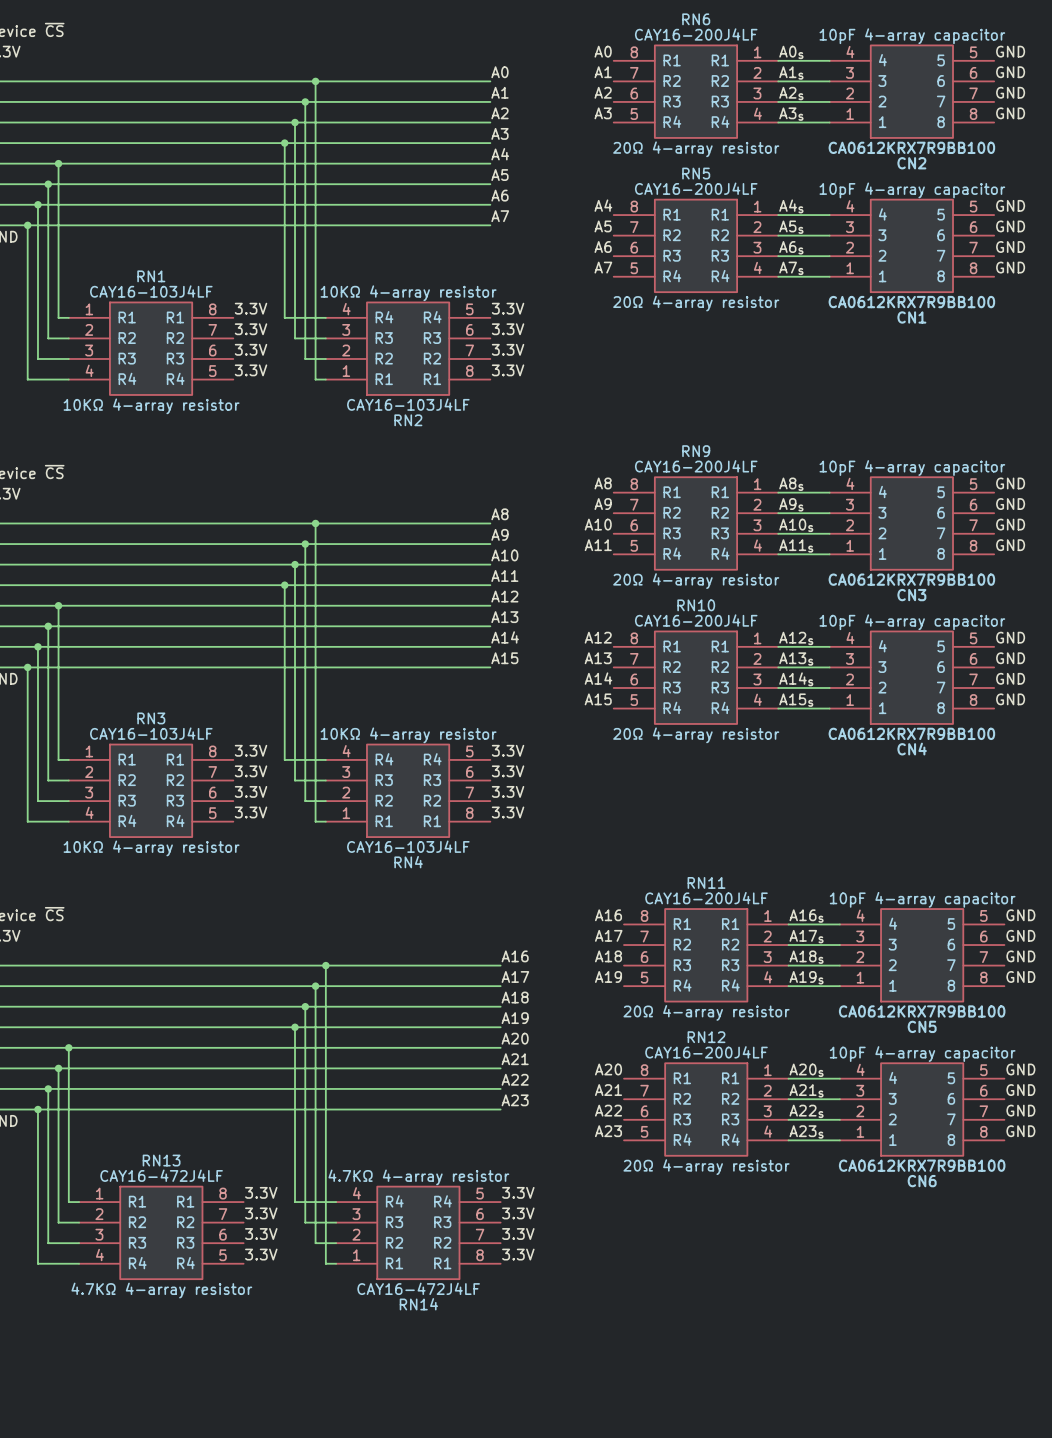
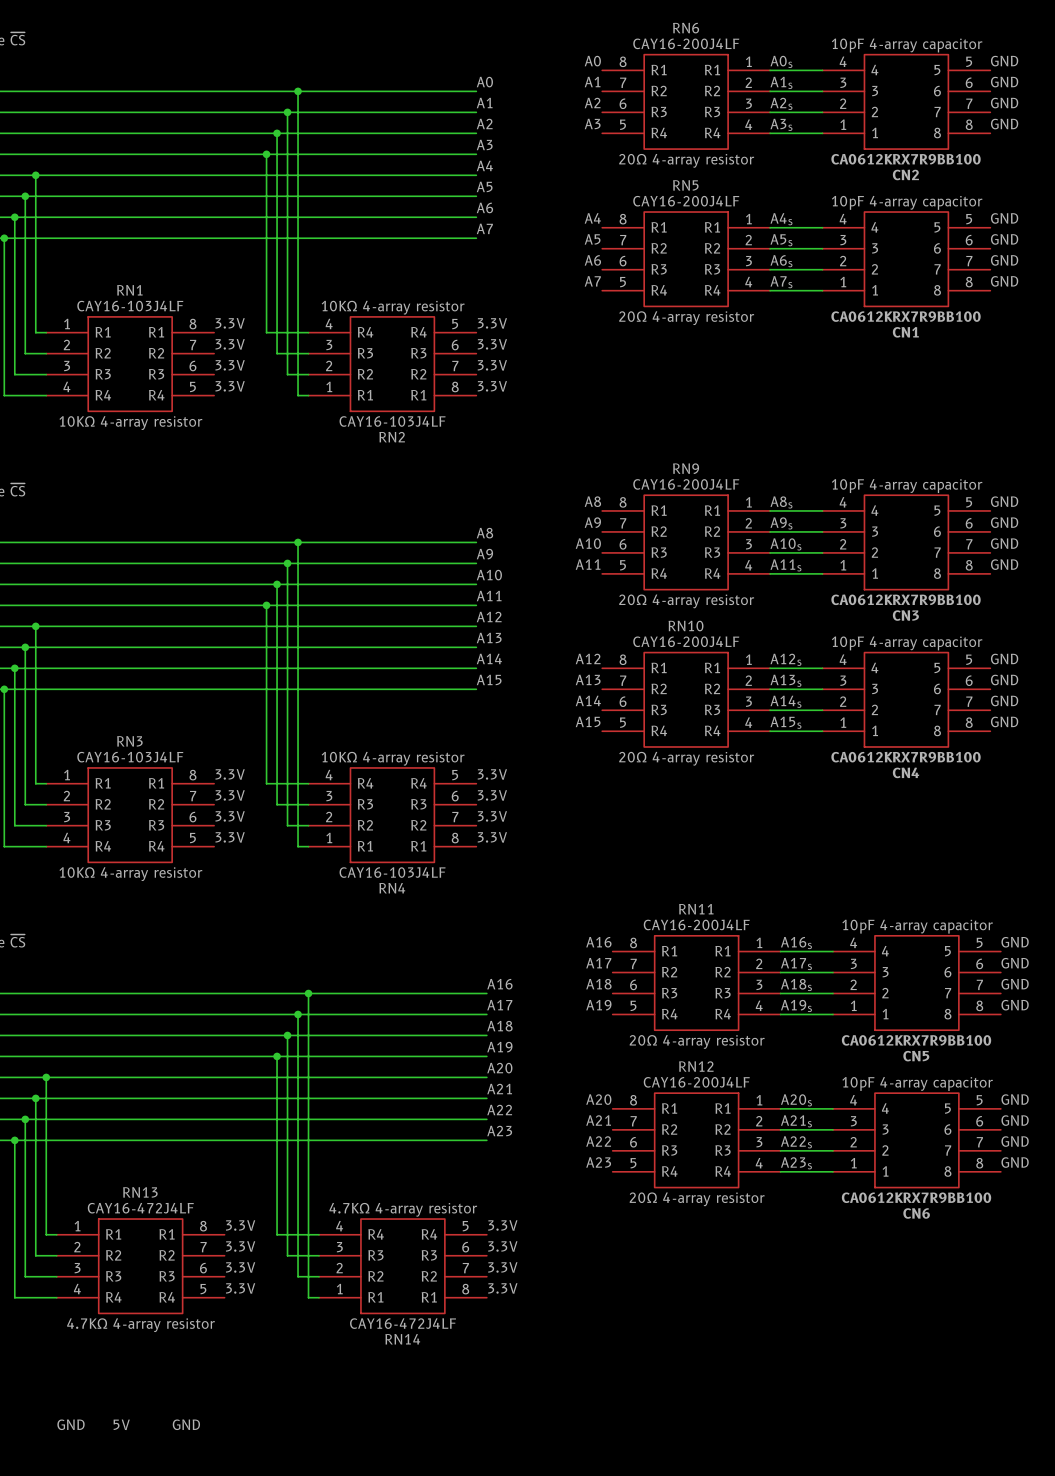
label: none -> GND (71, 1424)
label: none -> 5V (121, 1424)
label: none -> GND (186, 1424)

